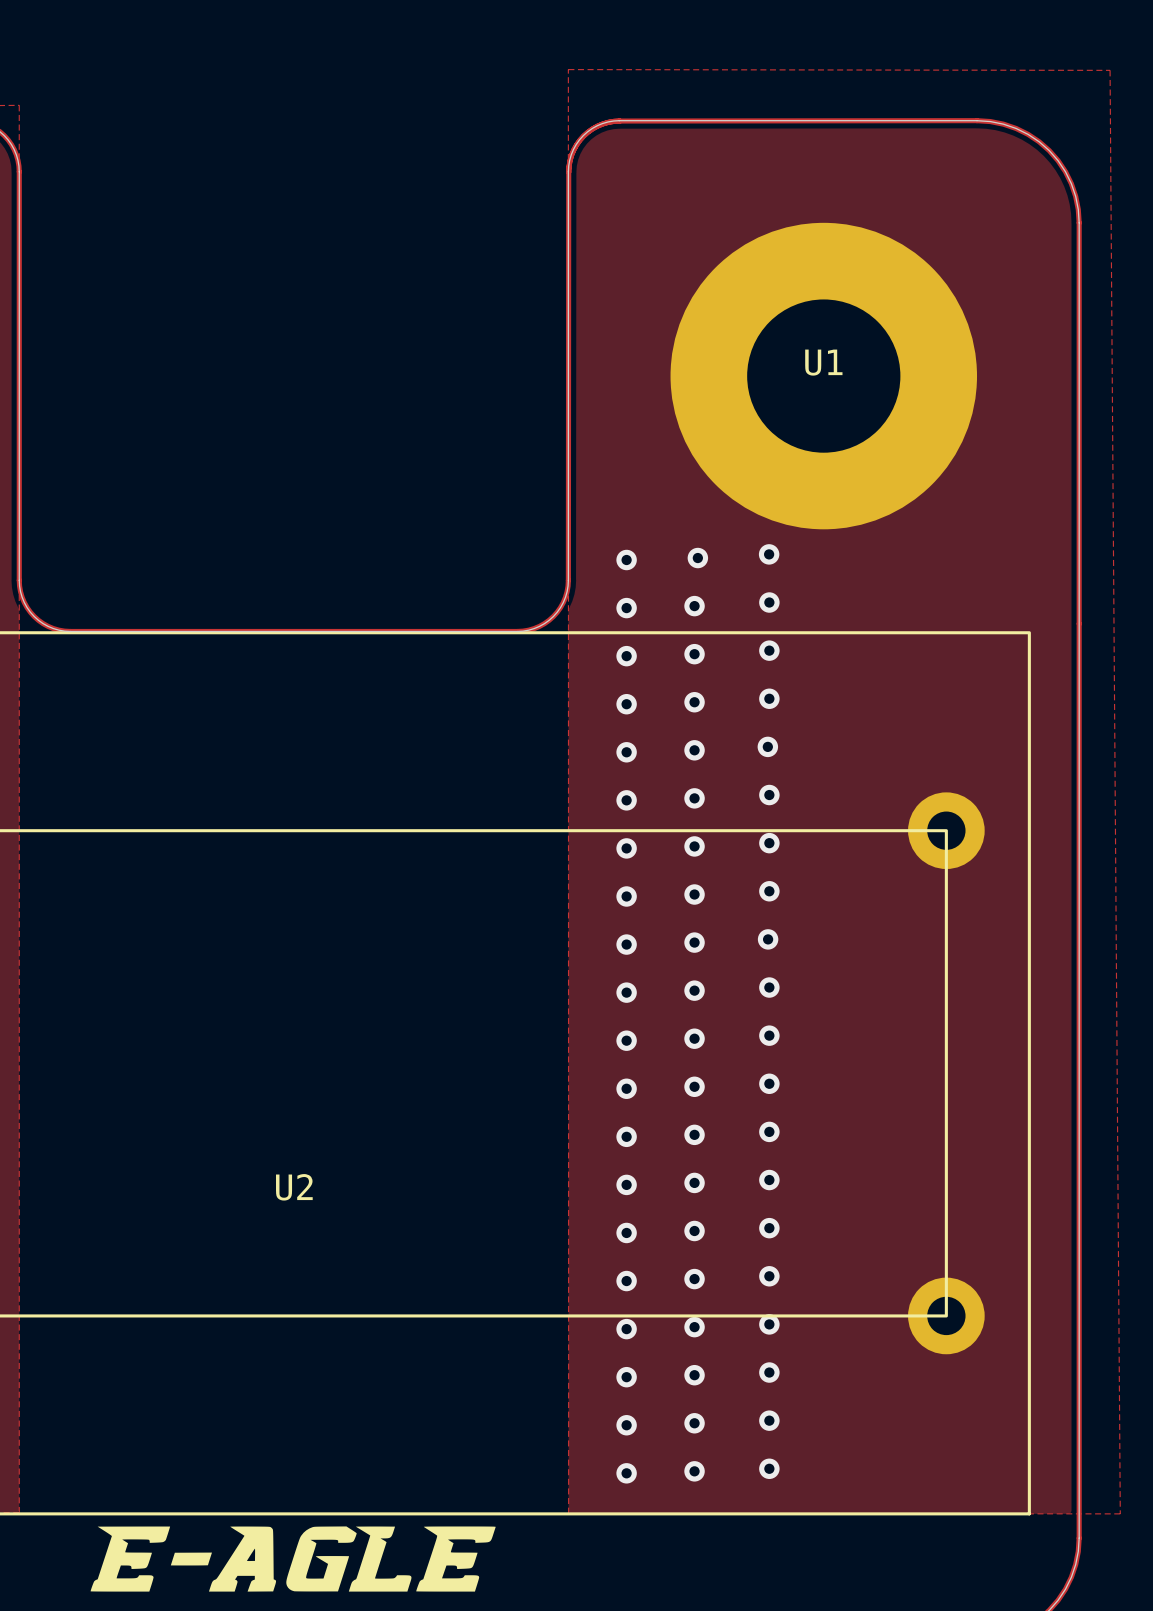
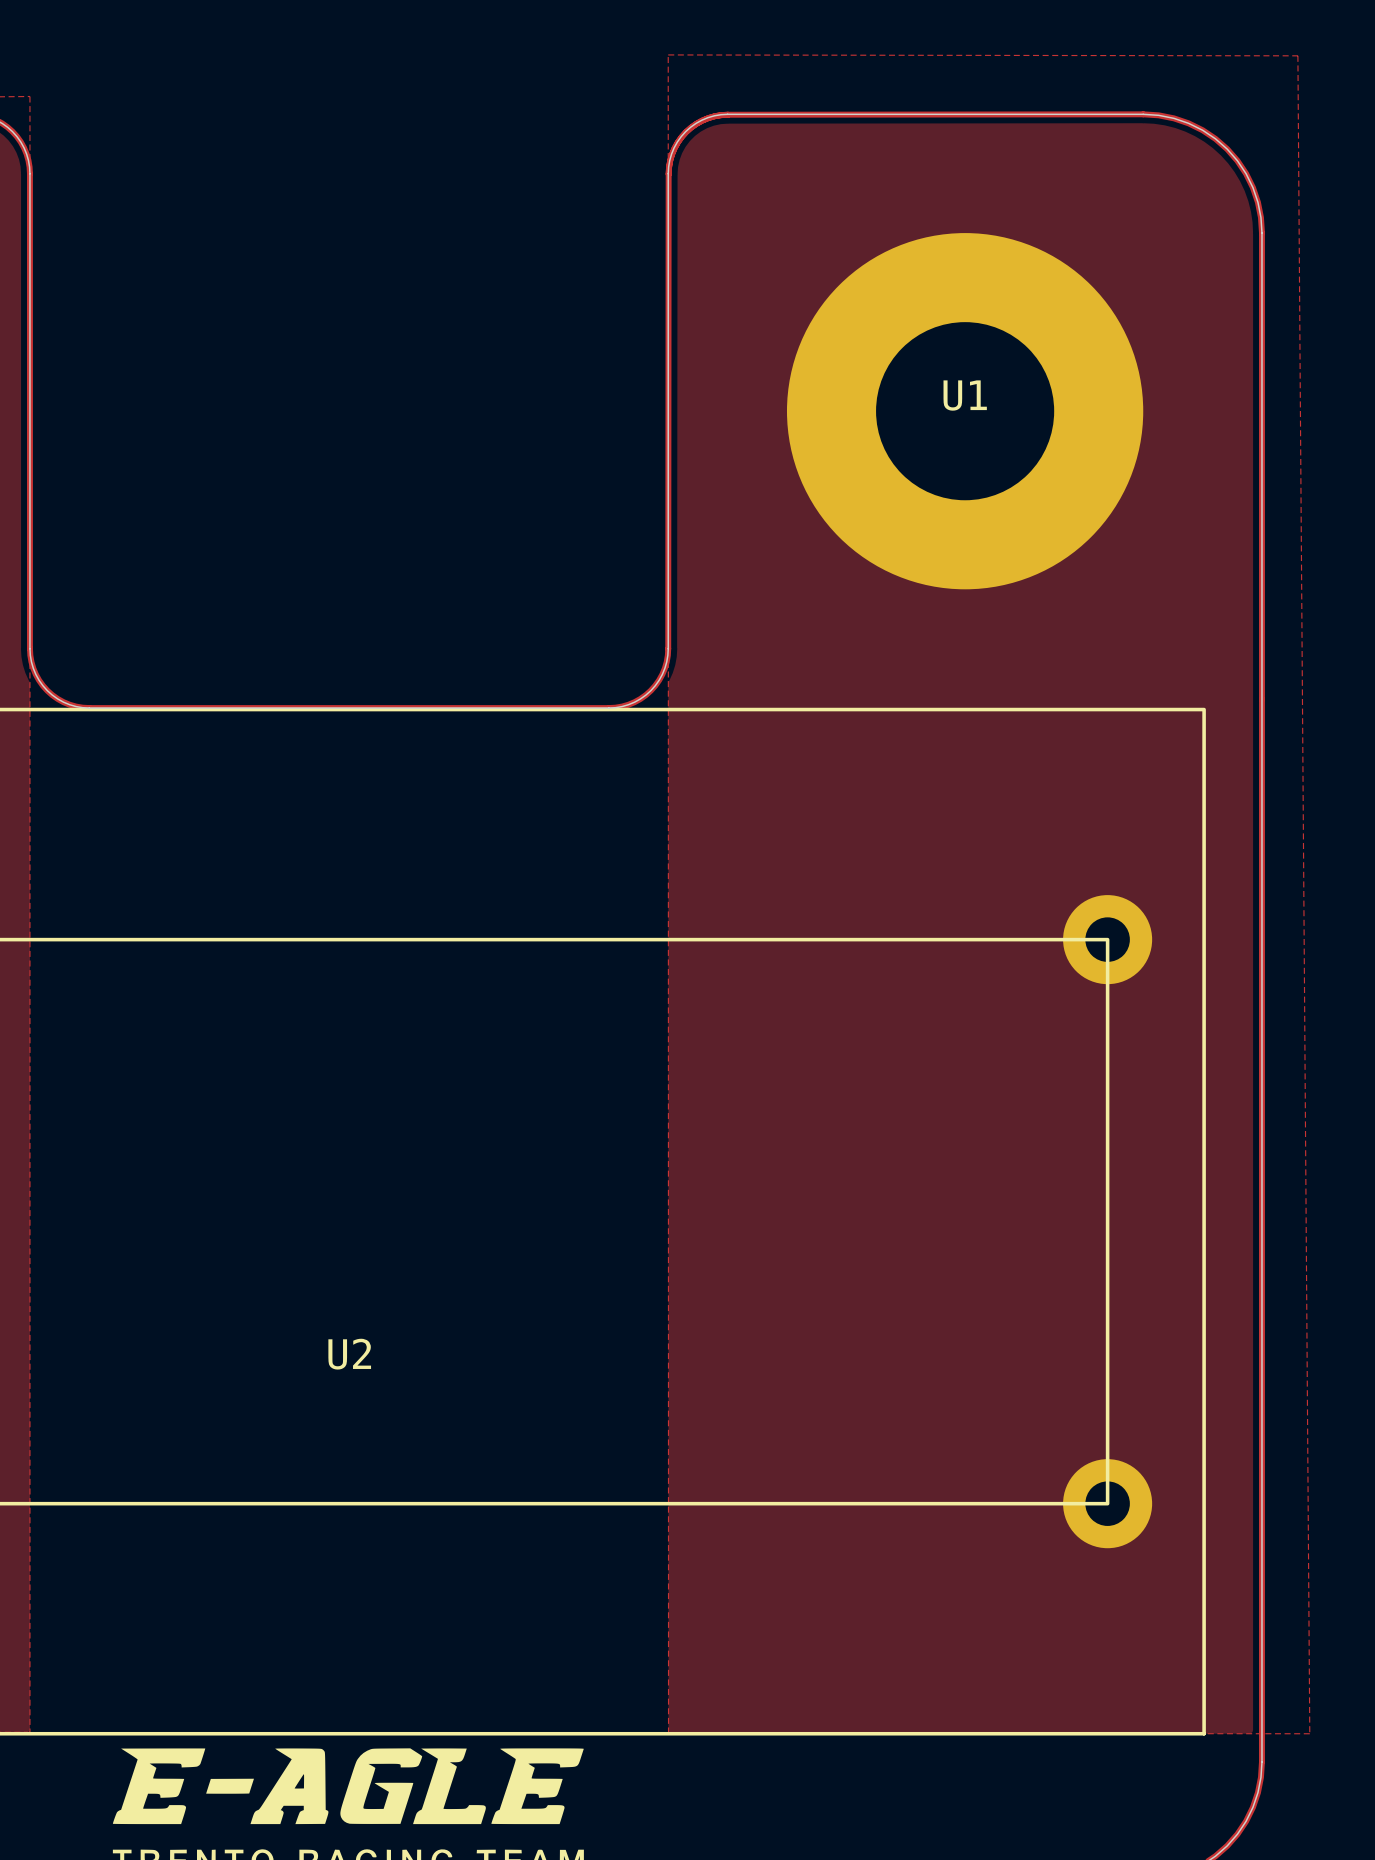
via: (769, 554) -> none
via: (697, 558) -> none
via: (626, 560) -> none
via: (769, 602) -> none
via: (694, 606) -> none
via: (626, 608) -> none
via: (769, 650) -> none
via: (694, 654) -> none
via: (626, 656) -> none
via: (769, 698) -> none
via: (694, 702) -> none
via: (626, 704) -> none
via: (767, 746) -> none
via: (694, 750) -> none
via: (626, 752) -> none
via: (769, 795) -> none
via: (694, 798) -> none
via: (626, 800) -> none
via: (769, 843) -> none
via: (694, 846) -> none
via: (626, 848) -> none
via: (769, 891) -> none
via: (694, 894) -> none
via: (626, 896) -> none
via: (768, 939) -> none
via: (694, 942) -> none
via: (626, 944) -> none
via: (769, 987) -> none
via: (694, 990) -> none
via: (626, 992) -> none
via: (769, 1035) -> none
via: (694, 1038) -> none
via: (626, 1040) -> none
via: (769, 1083) -> none
via: (694, 1086) -> none
via: (626, 1088) -> none
via: (769, 1131) -> none
via: (694, 1134) -> none
via: (626, 1136) -> none
via: (769, 1180) -> none
via: (694, 1182) -> none
via: (626, 1184) -> none
via: (769, 1228) -> none
via: (694, 1230) -> none
via: (626, 1232) -> none
via: (769, 1276) -> none
via: (694, 1279) -> none
via: (626, 1281) -> none
via: (769, 1324) -> none
via: (694, 1327) -> none
via: (626, 1329) -> none
via: (769, 1372) -> none
via: (694, 1375) -> none
via: (626, 1377) -> none
via: (769, 1420) -> none
via: (694, 1423) -> none
via: (626, 1425) -> none
via: (769, 1468) -> none
via: (694, 1471) -> none
via: (626, 1473) -> none

